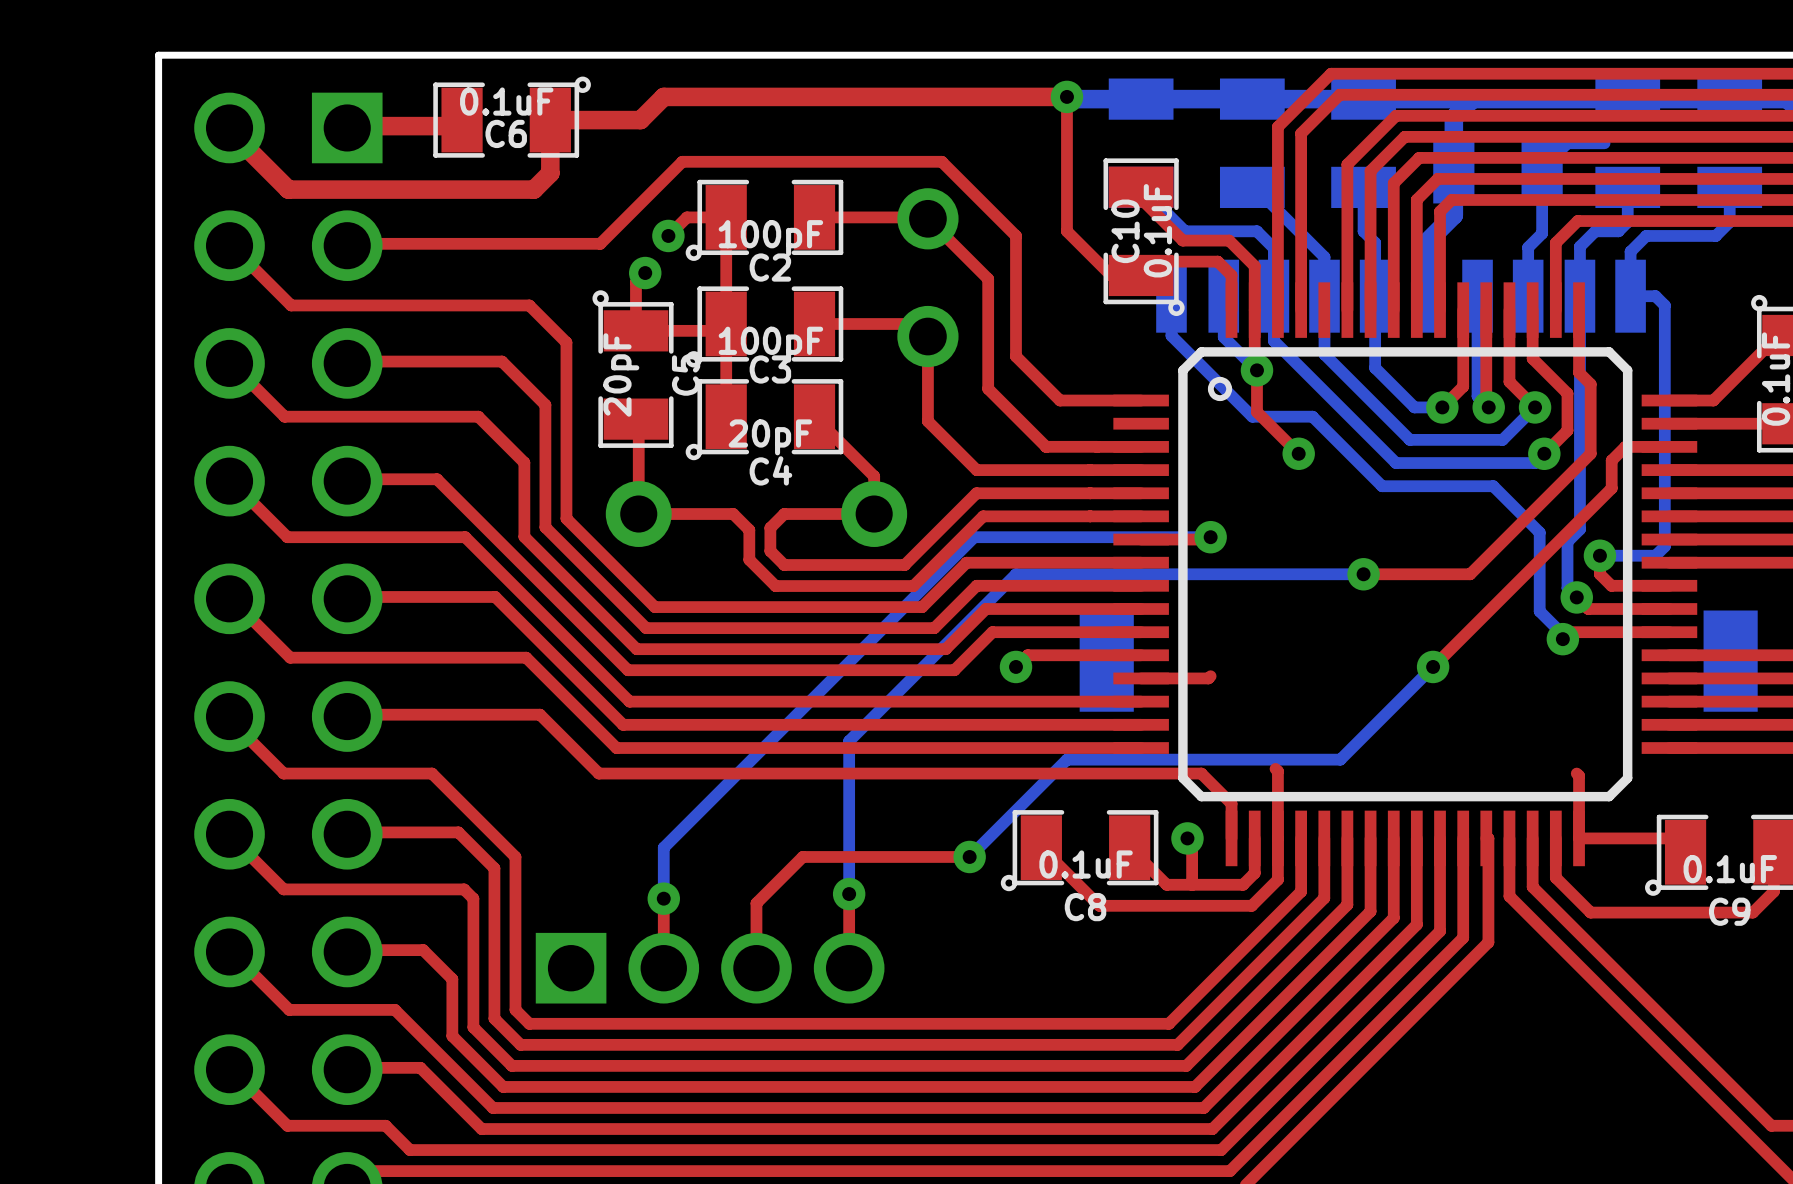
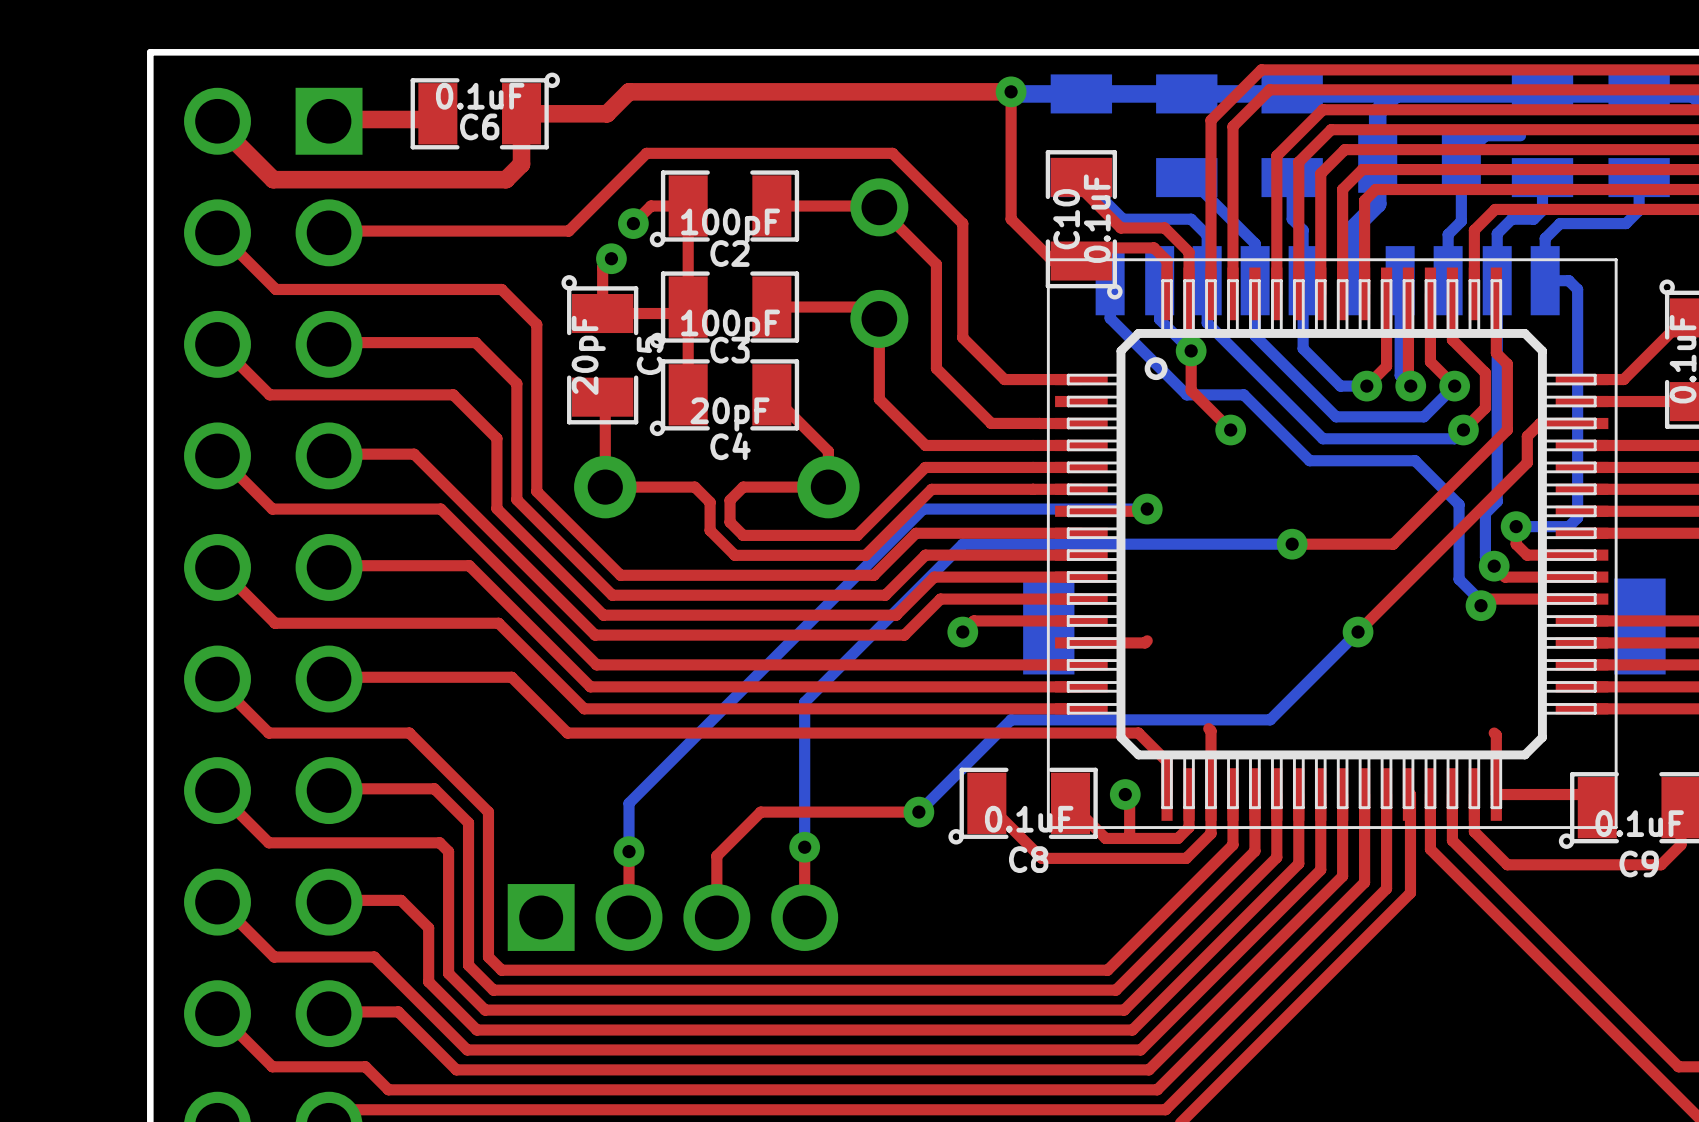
part footprint: [1113, 282, 1698, 867] -> [1046, 258, 1618, 829]

